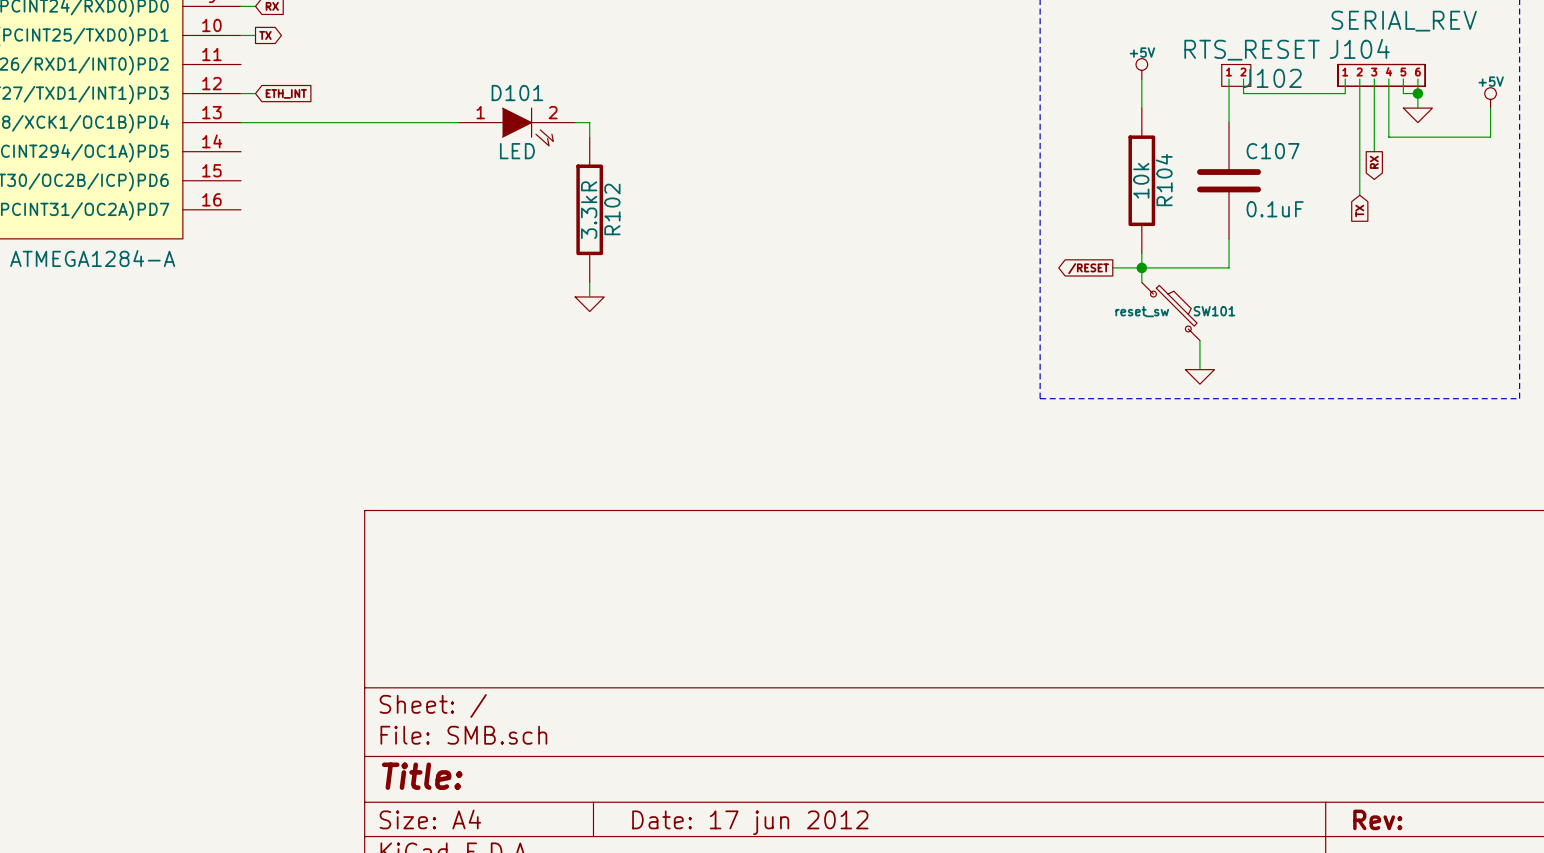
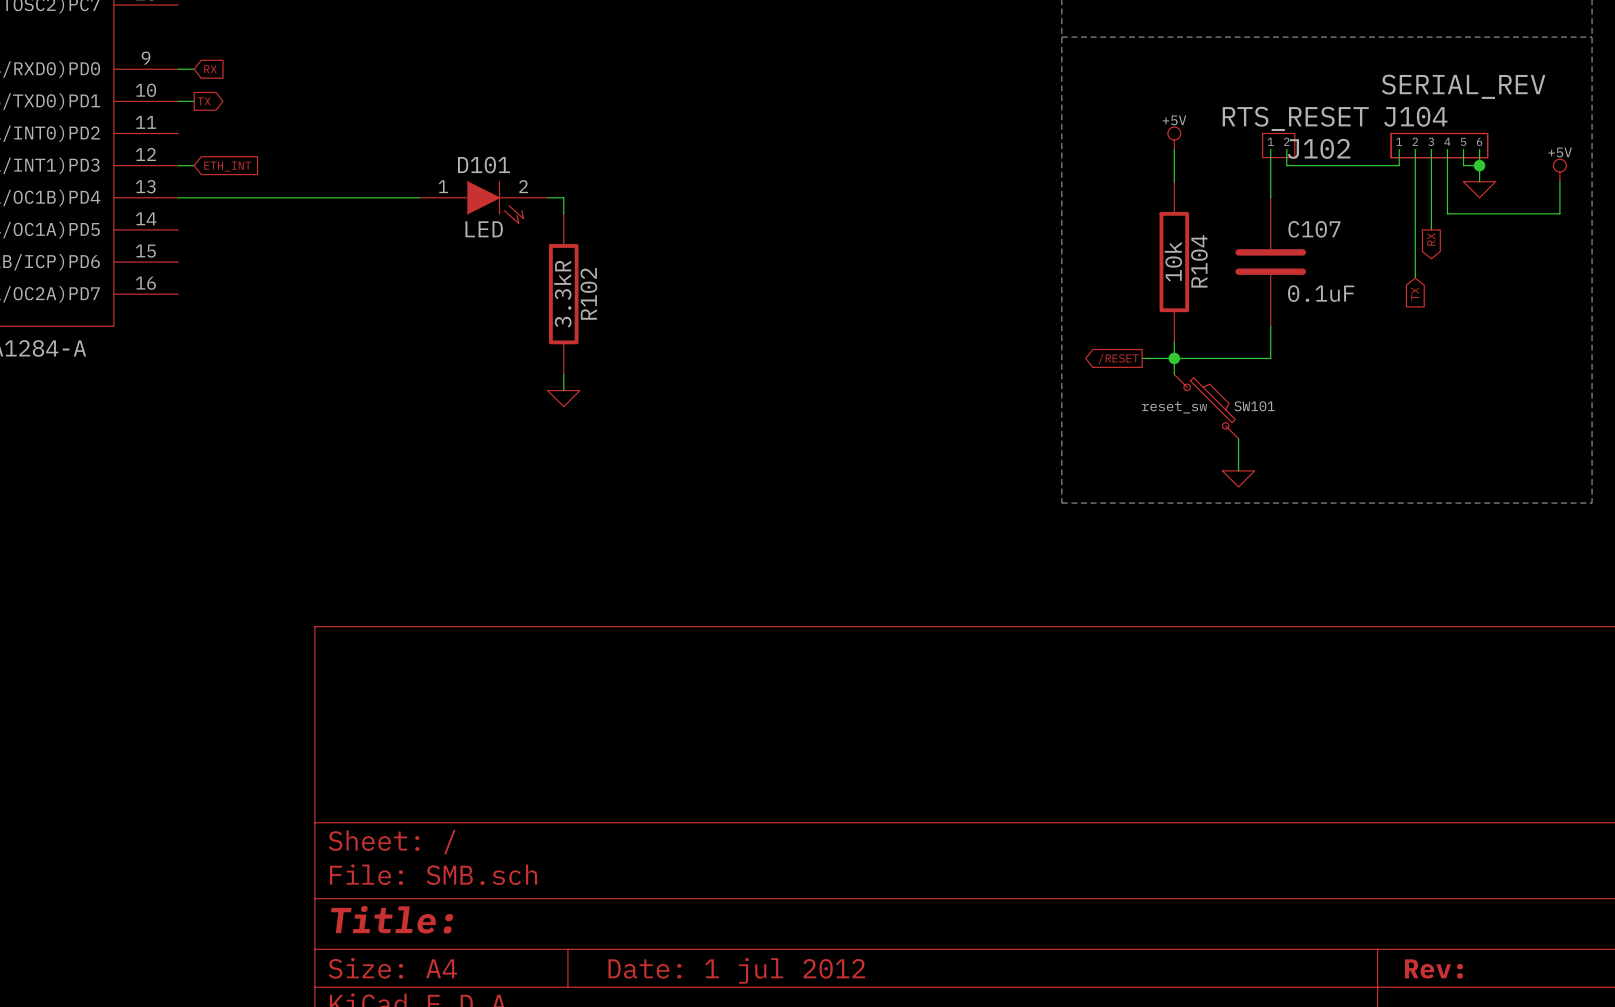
title block: Date: 17 jun 2012 (750, 822) -> Date: 1 jul 2012 (736, 970)

